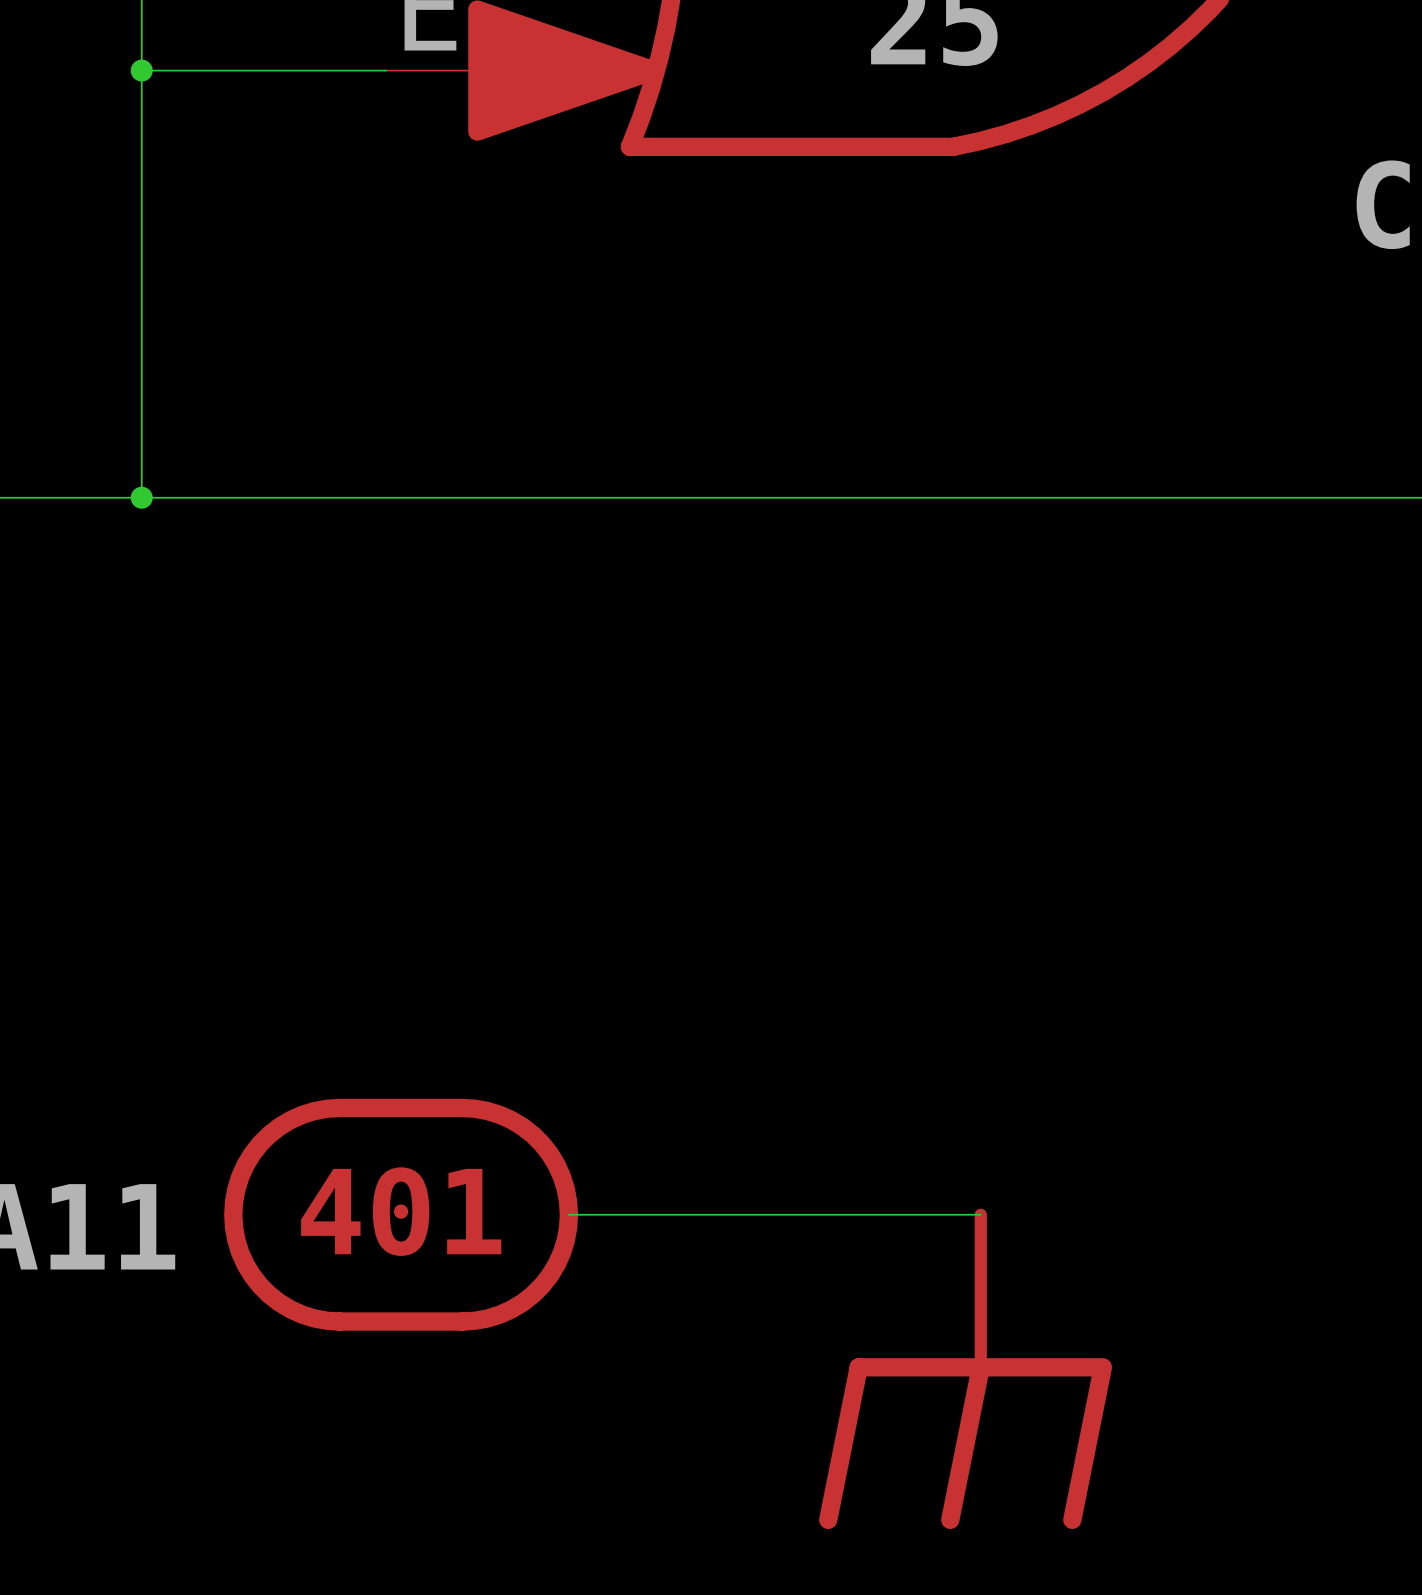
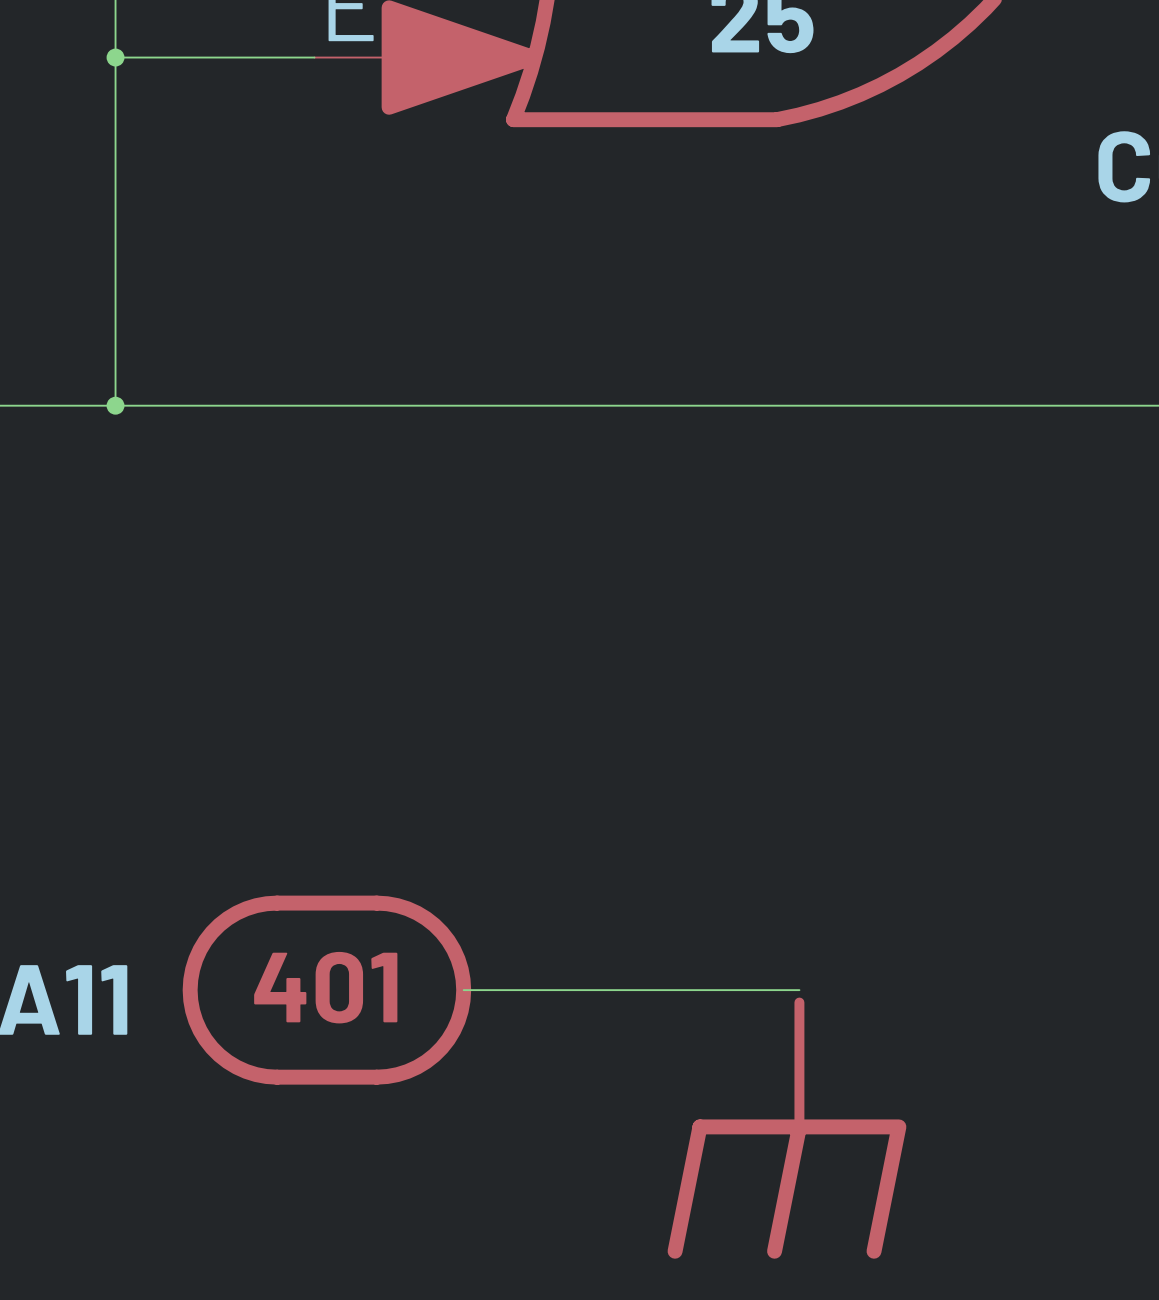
part position: (965, 1368) -> (786, 1128)

